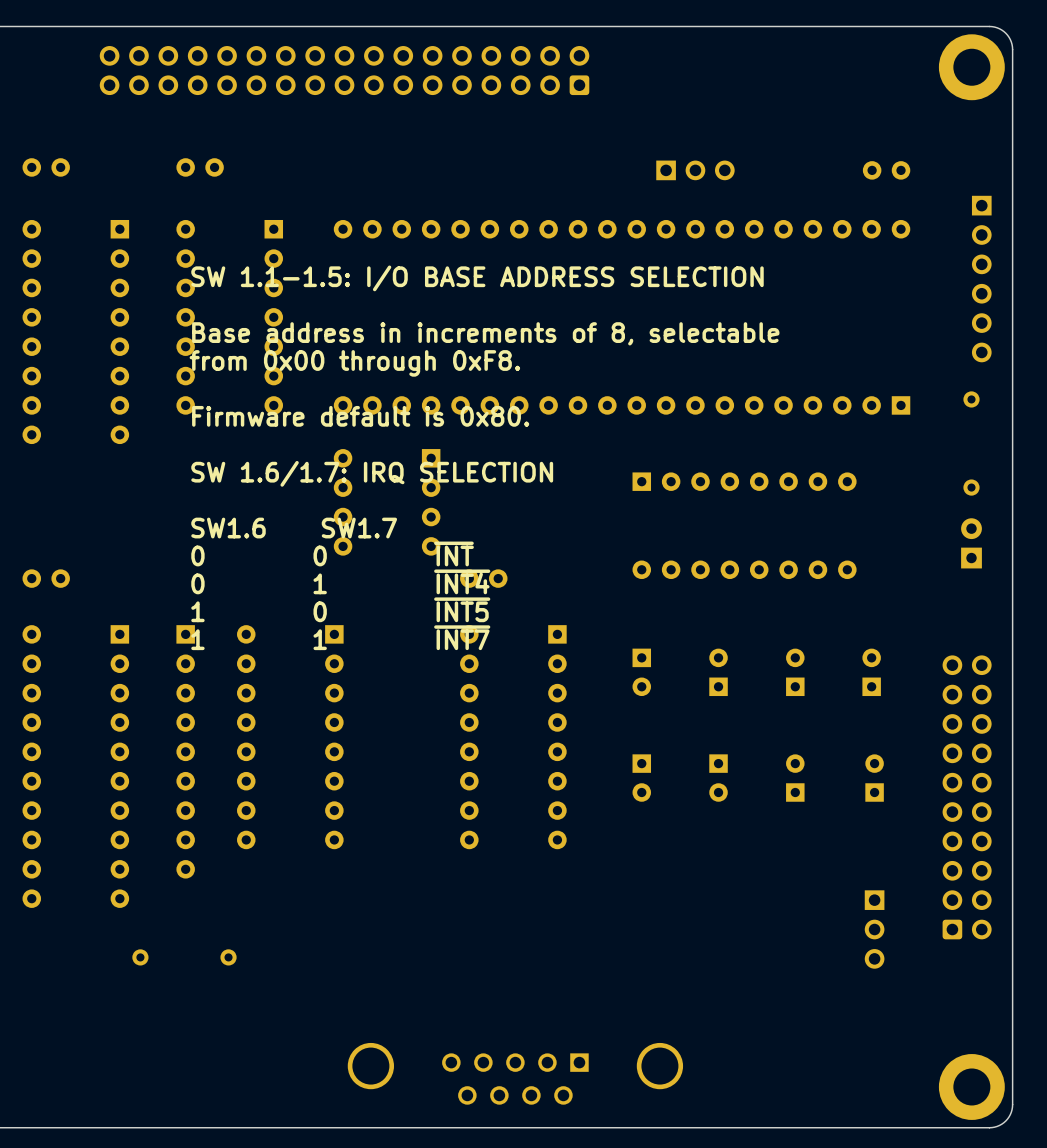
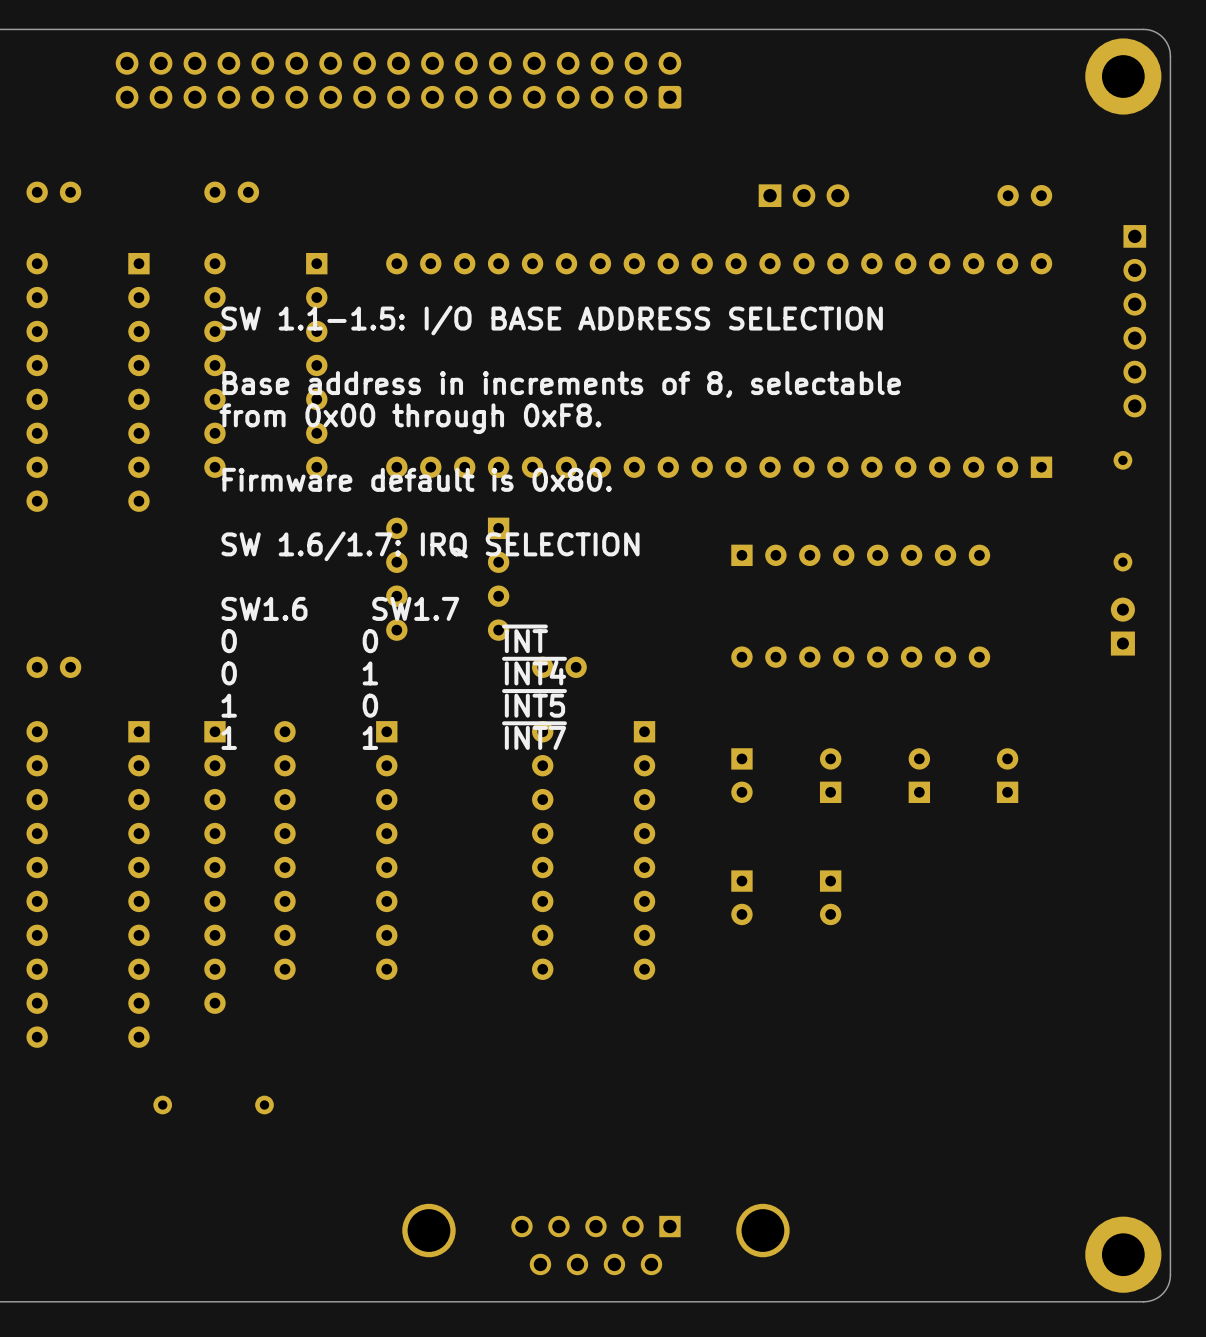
part: (795, 778) -> none
part: (874, 778) -> none
part: (967, 797) -> none
part: (874, 929) -> none

